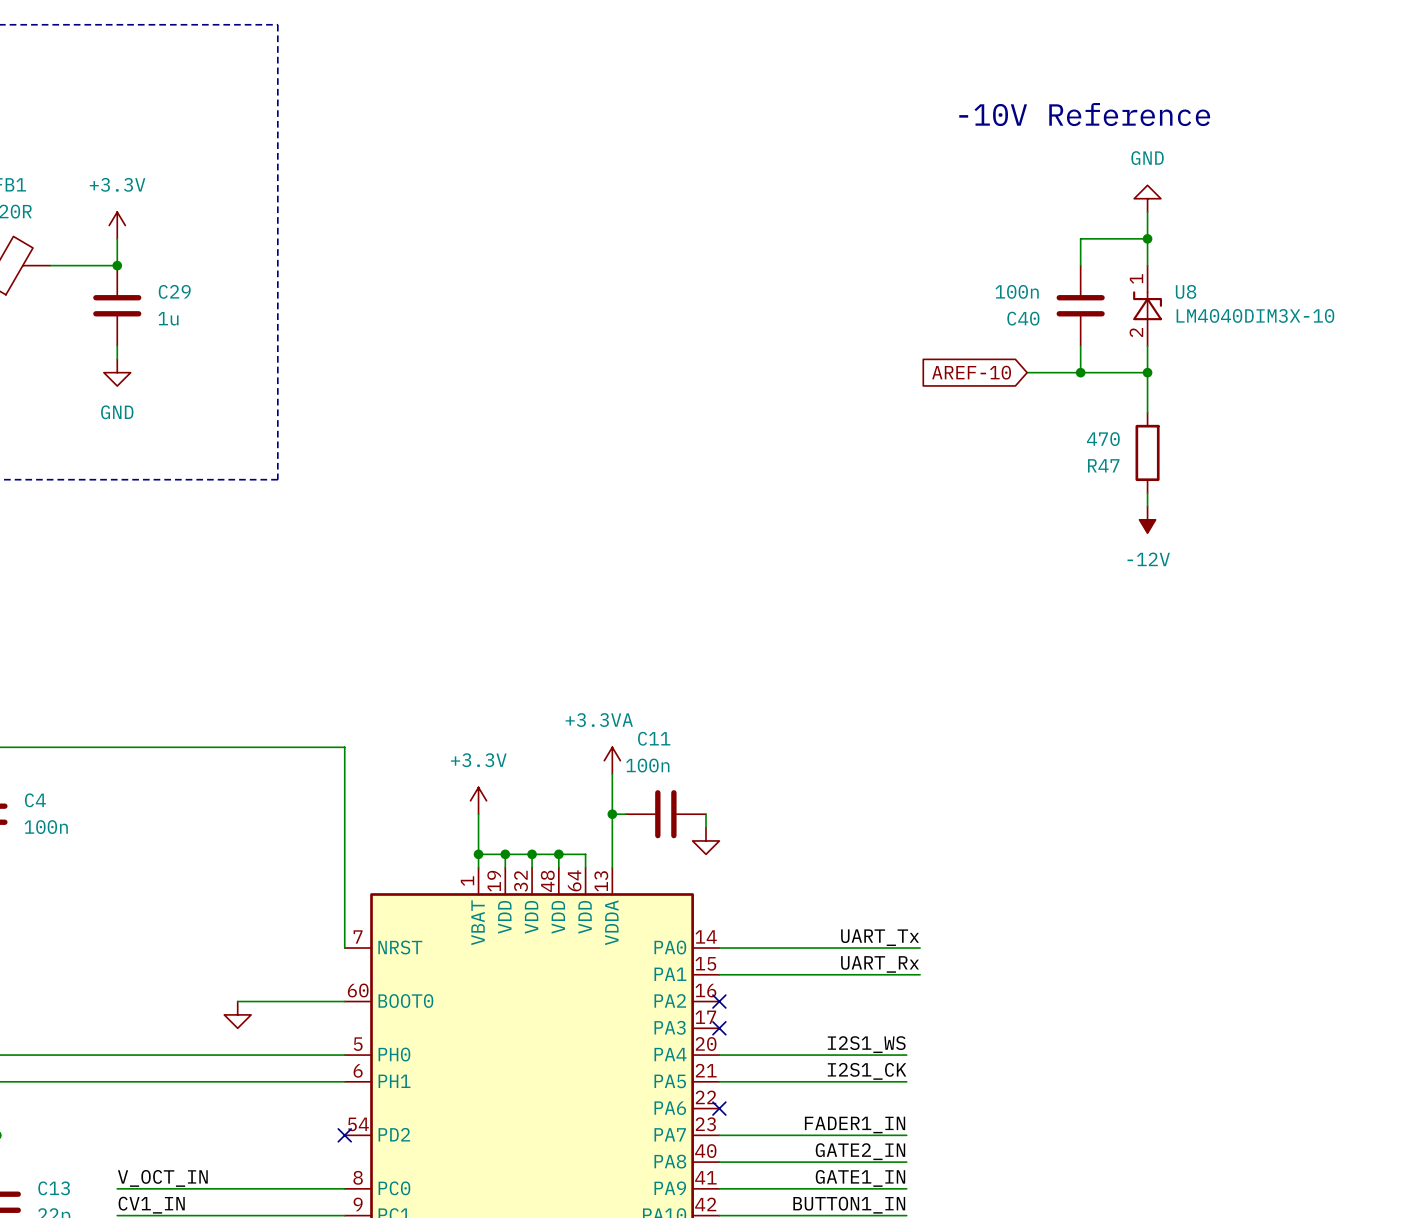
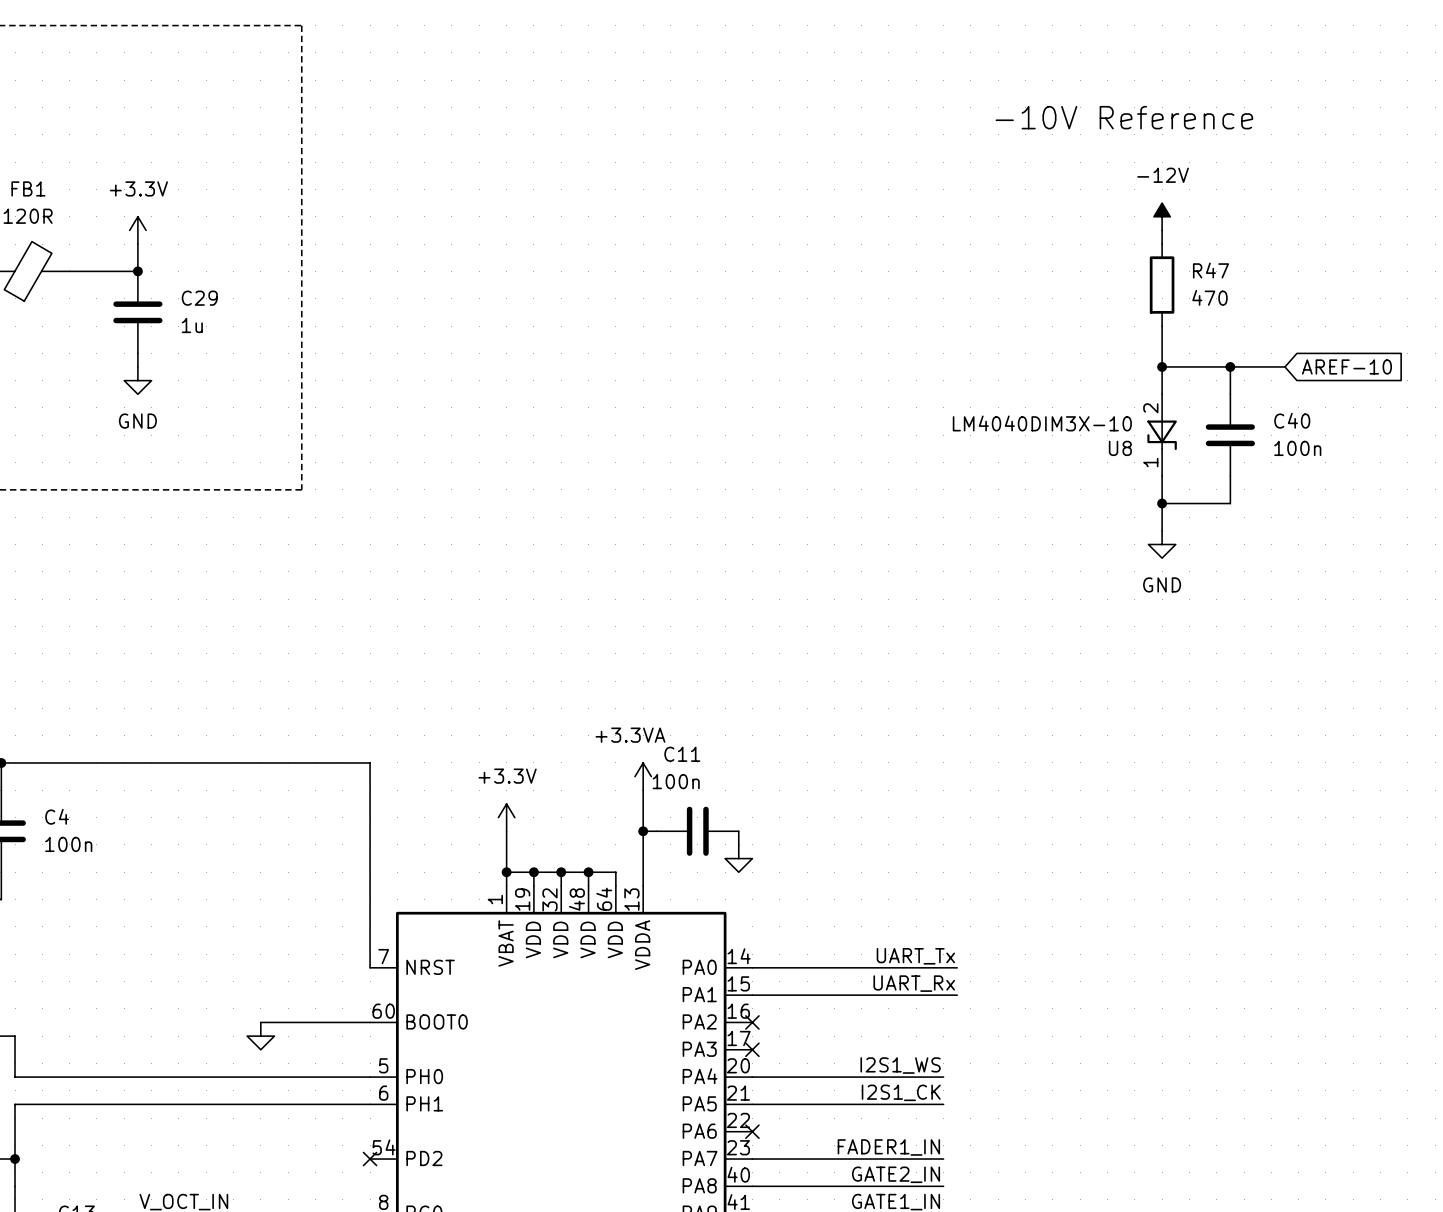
power symbol: GND (1147, 198) -> none
power symbol: none -> -12V (1162, 216)
wire: (1147, 212) (1147, 265) -> (1162, 476) (1162, 530)
wire: none -> (1162, 230) (1162, 244)
wire: (1147, 238) (1080, 238) (1080, 265) -> none
junction: (1147, 238) -> none
C40 value position: 100n (1017, 291) -> 100n (1297, 448)
C40 position: (1080, 305) -> (1230, 435)
U8 rotation: 0° (1147, 305) -> 180° (1162, 435)
U8 position: (1147, 305) -> (1162, 435)
C40 name position: C40 (1023, 318) -> C40 (1292, 420)
wire: (1080, 345) (1080, 372) -> (1230, 366) (1230, 394)
wire: (1147, 345) (1147, 412) -> (1162, 326) (1162, 394)
junction: none -> (1162, 366)
junction: none -> (1230, 366)
global label rotation: 0° (971, 372) -> 180° (1346, 366)
global label position: AREF-10 (971, 372) -> AREF-10 (1346, 366)
wire: (1027, 372) (1147, 372) -> (1162, 366) (1285, 366)
junction: (1080, 372) -> none
junction: (1147, 372) -> none
R47 value position: 470 (1103, 439) -> 470 (1209, 297)
R47 position: (1147, 452) -> (1162, 285)
R47 name position: R47 (1103, 465) -> R47 (1210, 270)
wire: none -> (1230, 476) (1230, 503) (1162, 503)
junction: none -> (1162, 503)
wire: (1147, 493) (1147, 506) -> none
power symbol: -12V (1147, 519) -> none
power symbol: none -> GND (1162, 544)

